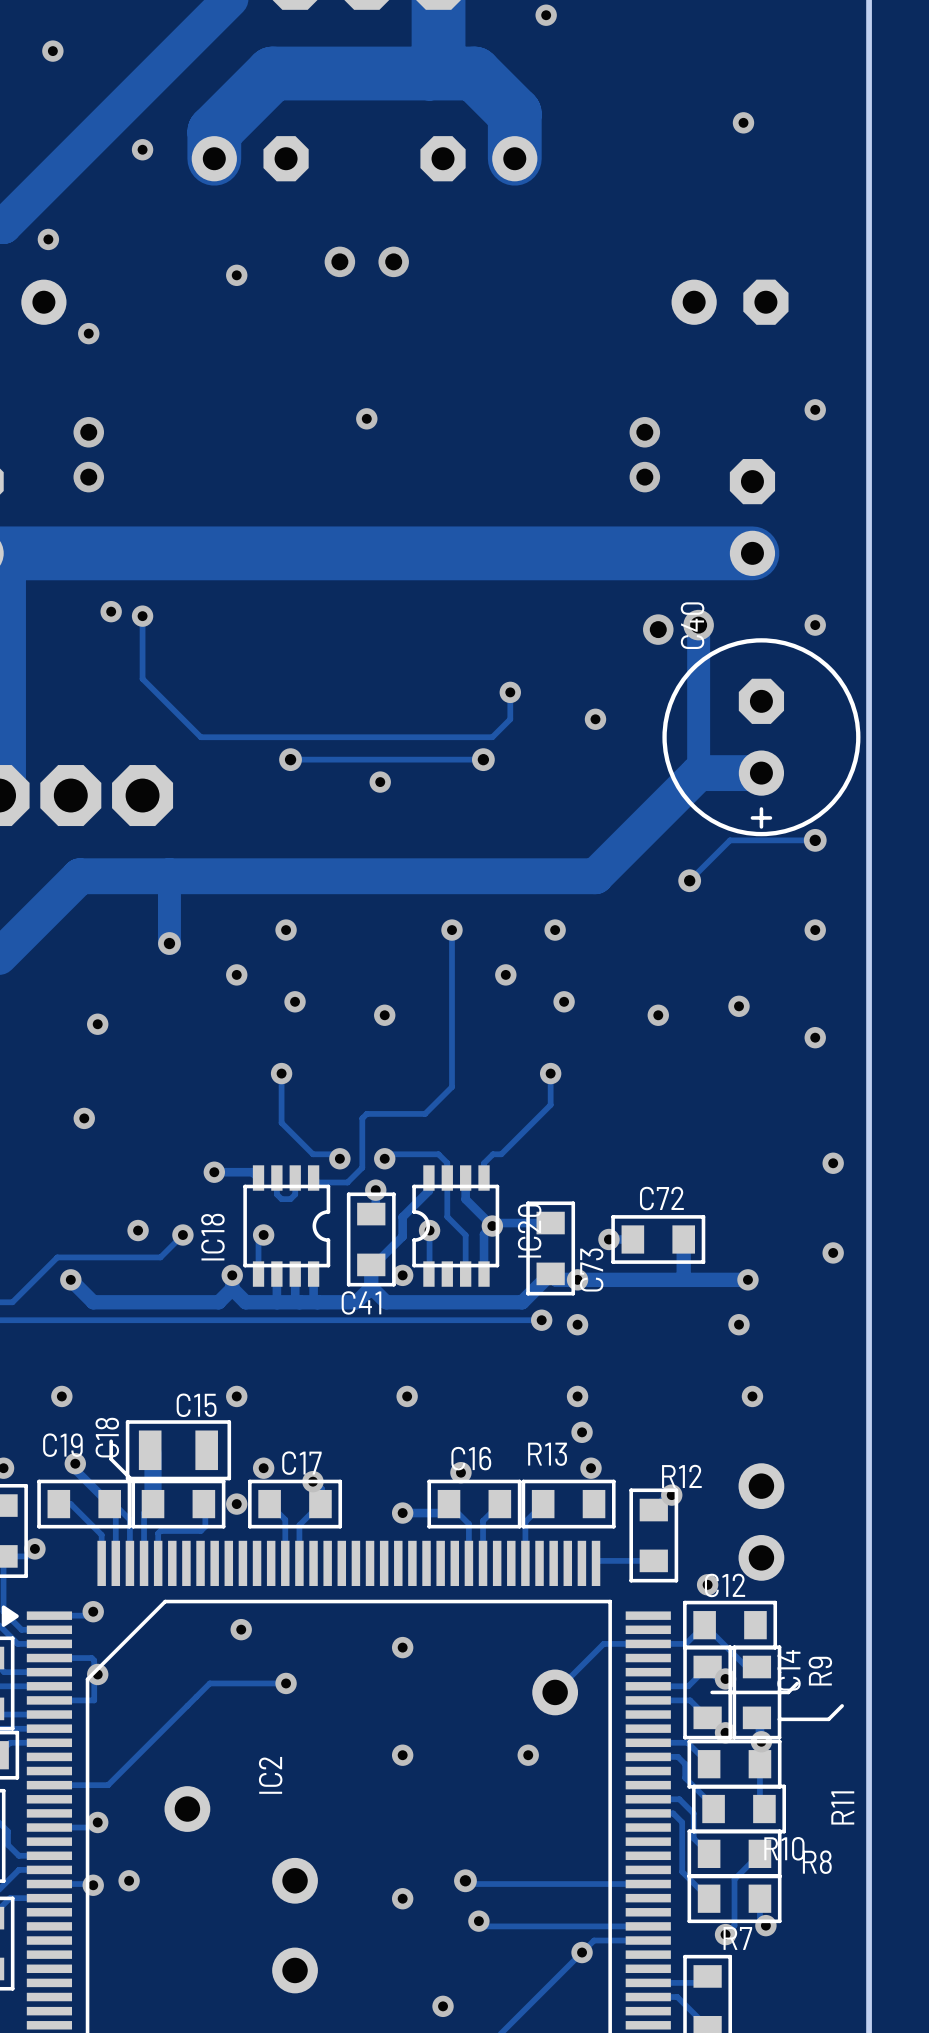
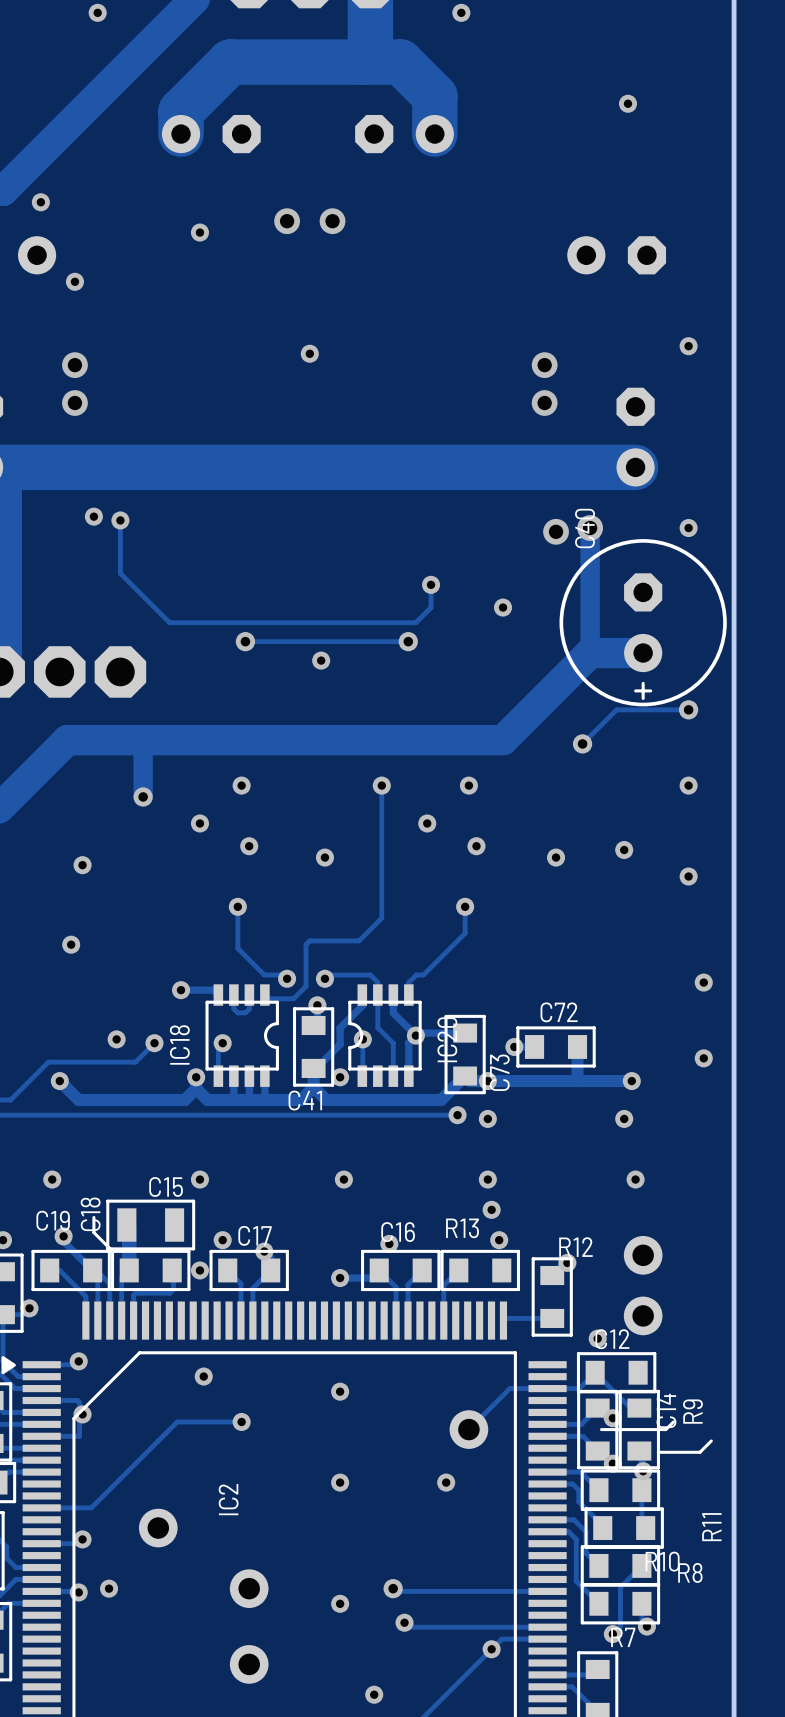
via: none -> (97, 12)
via: (52, 51) -> none
via: (142, 149) -> none

